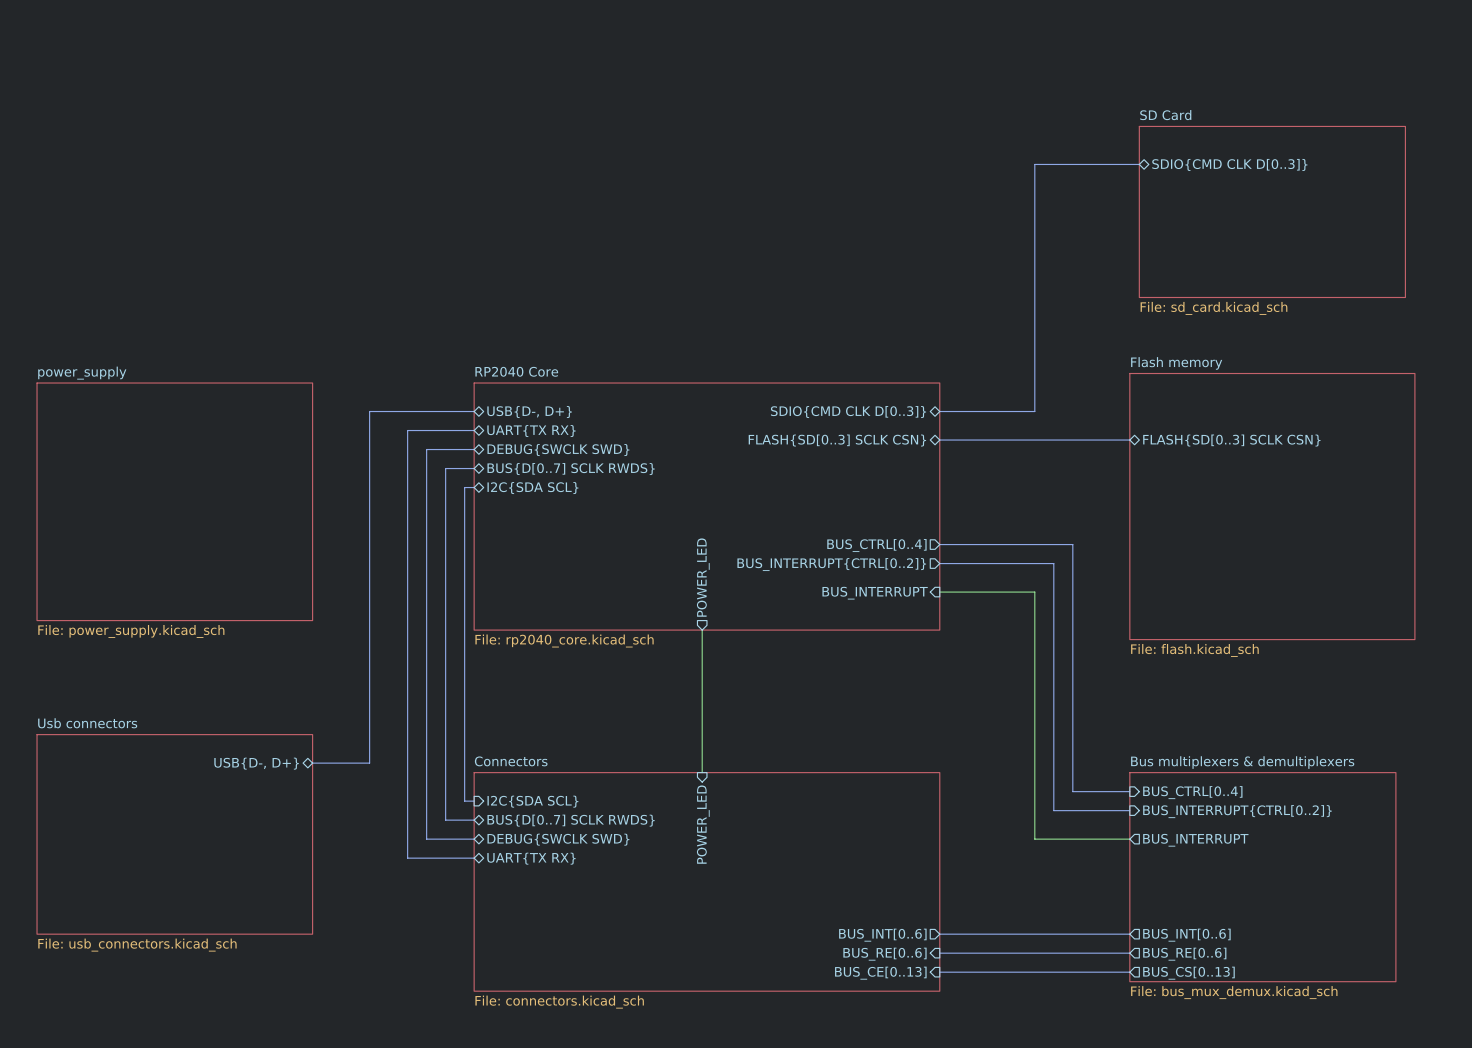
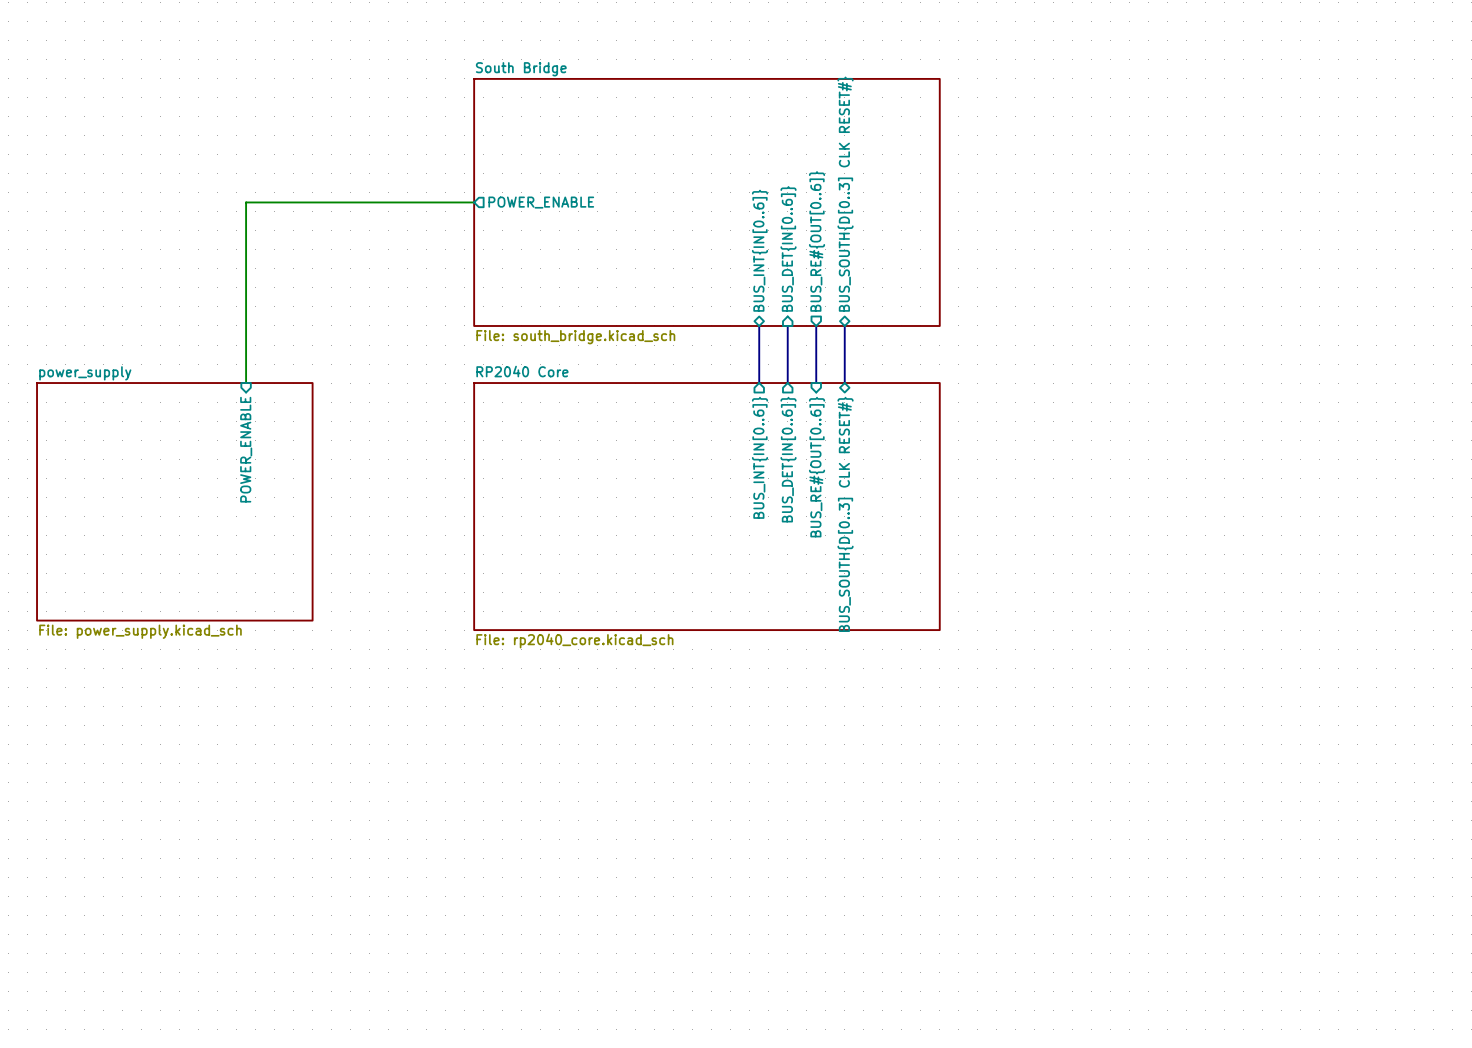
bus: (1139, 164) (1034, 164) (1034, 411) (939, 411) -> none
sheet pin: SDIO{CMD CLK D[0..3]} (1229, 164) -> none
sheet pin: none -> BUS_SOUTH{D[0..3] CLK RESET#} (845, 194)
wire: none -> (474, 202) (246, 202) (246, 383)
sheet South Bridge: none -> File: south_bridge.kicad_sch (706, 202)
sheet pin: none -> POWER_ENABLE (541, 202)
sheet SD Card: File: sd_card.kicad_sch (1272, 211) -> none
sheet pin: none -> BUS_RE#{OUT[0..6]} (817, 241)
sheet pin: none -> BUS_DET{IN[0..6]} (788, 248)
sheet pin: none -> BUS_INT{IN[0..6]} (760, 250)
bus: none -> (759, 325) (759, 383)
bus: none -> (787, 325) (787, 383)
bus: none -> (816, 325) (816, 383)
bus: none -> (844, 325) (844, 383)
bus: (474, 411) (369, 411) (369, 763) (312, 763) -> none
sheet pin: USB{D-, D+} (529, 412) -> none
sheet pin: SDIO{CMD CLK D[0..3]} (848, 412) -> none
bus: (474, 430) (407, 430) (407, 858) (474, 858) -> none
sheet pin: UART{TX RX} (531, 431) -> none
sheet pin: FLASH{SD[0..3] SCLK CSN} (837, 440) -> BUS_SOUTH{D[0..3] CLK RESET#} (845, 514)
bus: (939, 440) (1129, 440) -> none
sheet pin: FLASH{SD[0..3] SCLK CSN} (1231, 440) -> none
sheet pin: none -> POWER_ENABLE (246, 449)
bus: (474, 449) (426, 449) (426, 839) (474, 839) -> none
sheet pin: DEBUG{SWCLK SWD} (558, 450) -> none
sheet pin: none -> BUS_INT{IN[0..6]} (760, 457)
sheet pin: none -> BUS_DET{IN[0..6]} (788, 459)
sheet pin: none -> BUS_RE#{OUT[0..6]} (817, 467)
bus: (474, 468) (445, 468) (445, 820) (474, 820) -> none
sheet pin: BUS{D[0..7] SCLK RWDS} (571, 469) -> none
bus: (474, 487) (464, 487) (464, 801) (474, 801) -> none
sheet pin: I2C{SDA SCL} (532, 488) -> none
sheet Flash memory: File: flash.kicad_sch (1272, 506) -> none
bus: (939, 544) (1072, 544) (1072, 791) (1129, 791) -> none
sheet pin: BUS_CTRL[0..4] (876, 545) -> none
bus: (939, 563) (1053, 563) (1053, 810) (1129, 810) -> none
sheet pin: BUS_INTERRUPT{CTRL[0..2]} (831, 564) -> none
sheet pin: POWER_LED (703, 577) -> none
wire: (939, 592) (1034, 592) (1034, 839) (1129, 839) -> none
sheet pin: BUS_INTERRUPT (875, 593) -> none
wire: (702, 630) (702, 772) -> none
sheet pin: USB{D-, D+} (256, 763) -> none
sheet pin: BUS_CTRL[0..4] (1192, 792) -> none
sheet pin: I2C{SDA SCL} (532, 801) -> none
sheet pin: BUS_INTERRUPT{CTRL[0..2]} (1237, 811) -> none
sheet pin: BUS{D[0..7] SCLK RWDS} (571, 820) -> none
sheet pin: POWER_LED (703, 824) -> none
sheet Usb connectors: File: usb_connectors.kicad_sch (174, 834) -> none
sheet pin: DEBUG{SWCLK SWD} (558, 839) -> none
sheet pin: BUS_INTERRUPT (1195, 840) -> none
sheet pin: UART{TX RX} (531, 858) -> none
sheet Bus multiplexers & demultiplexers: File: bus_mux_demux.kicad_sch (1262, 877) -> none
sheet Connectors: File: connectors.kicad_sch (706, 881) -> none
bus: (939, 934) (1129, 934) -> none
sheet pin: BUS_INT[0..6] (882, 935) -> none
sheet pin: BUS_INT[0..6] (1186, 935) -> none
bus: (939, 953) (1129, 953) -> none
sheet pin: BUS_RE[0..6] (884, 954) -> none
sheet pin: BUS_RE[0..6] (1184, 954) -> none
bus: (939, 972) (1129, 972) -> none
sheet pin: BUS_CE[0..13] (880, 973) -> none
sheet pin: BUS_CS[0..13] (1188, 973) -> none

